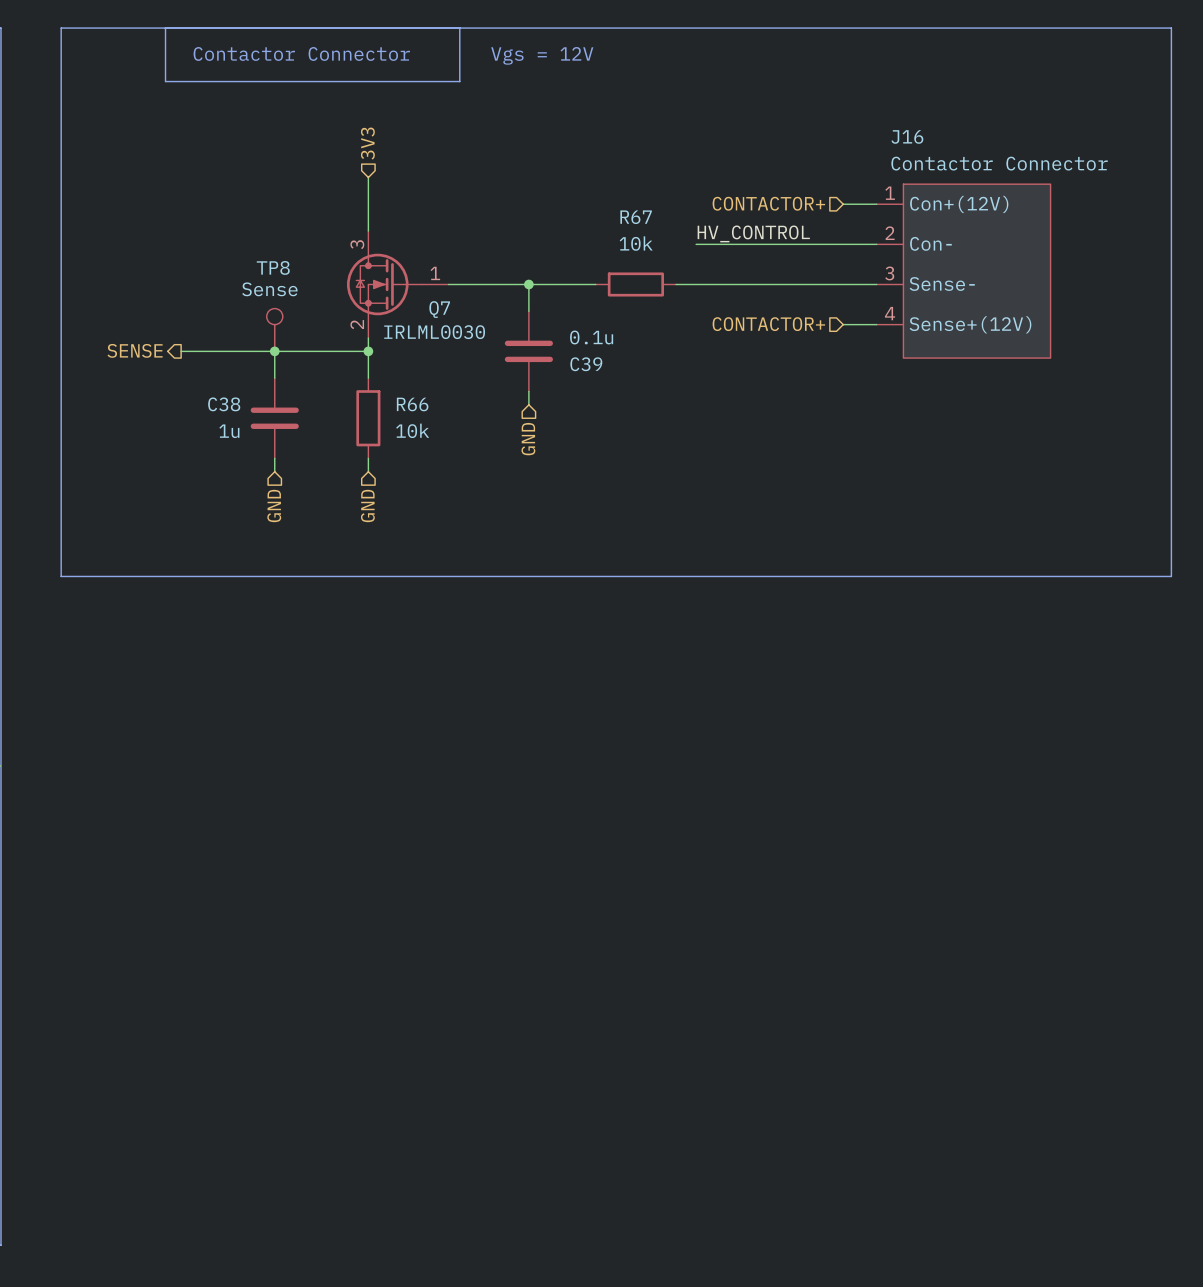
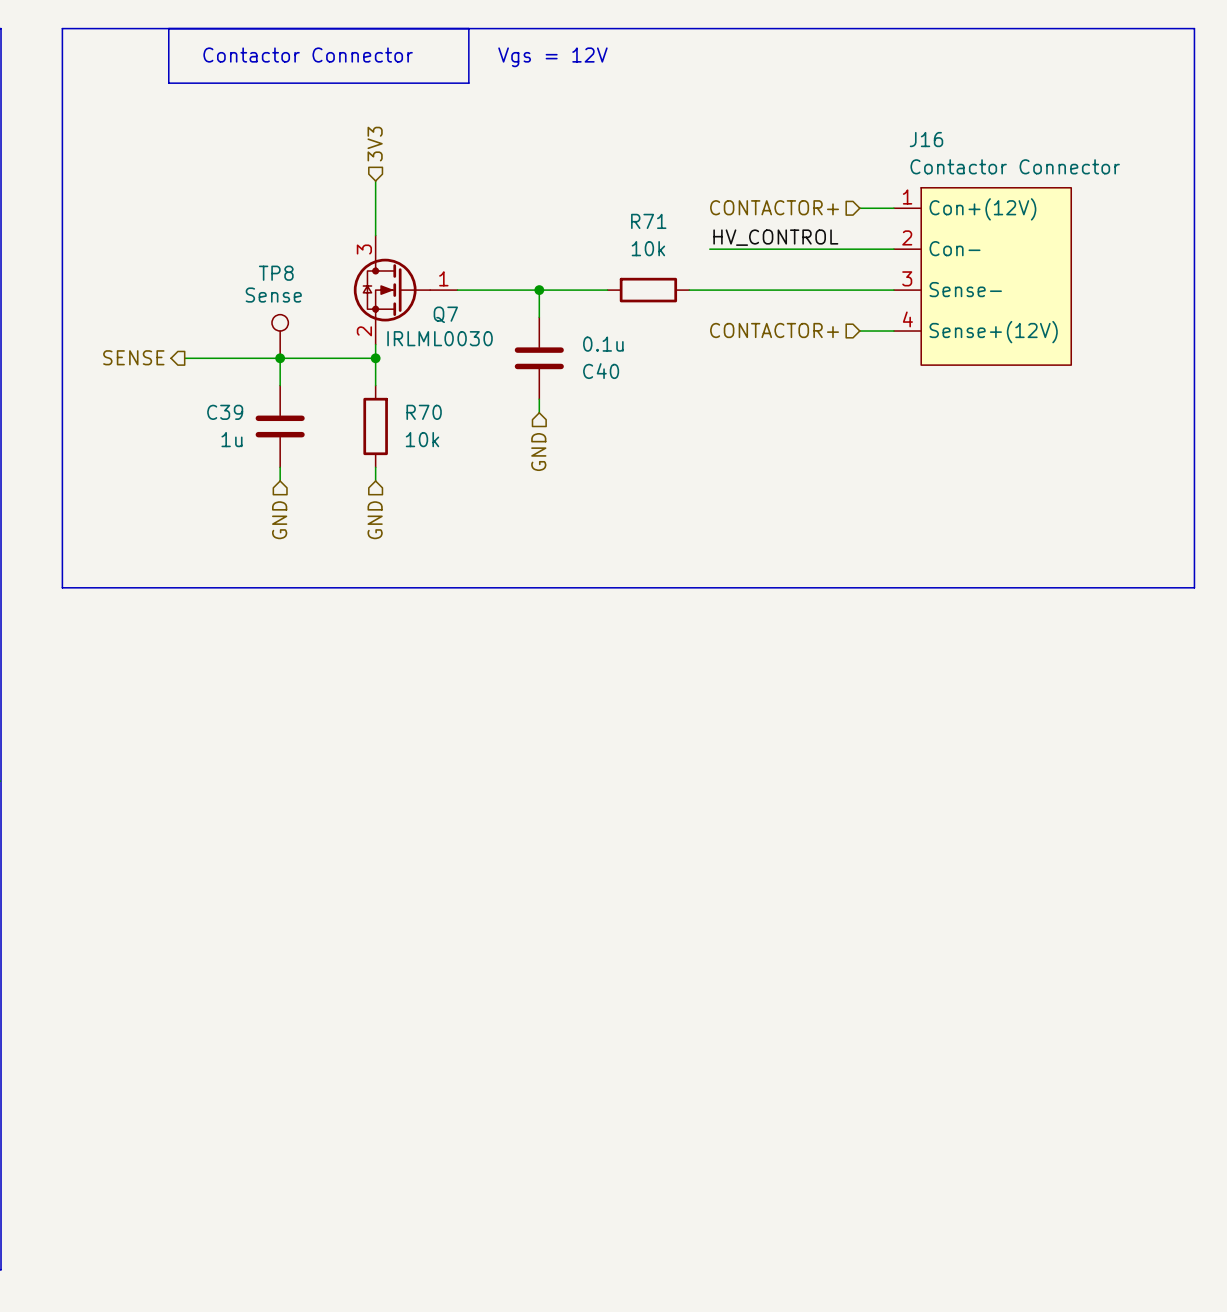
R67 name: R67 (636, 217) -> R71 (648, 221)
C39 name: C39 (586, 364) -> C40 (601, 371)
C38 name: C38 (224, 404) -> C39 (225, 412)
R66 name: R66 (412, 404) -> R70 (424, 412)

